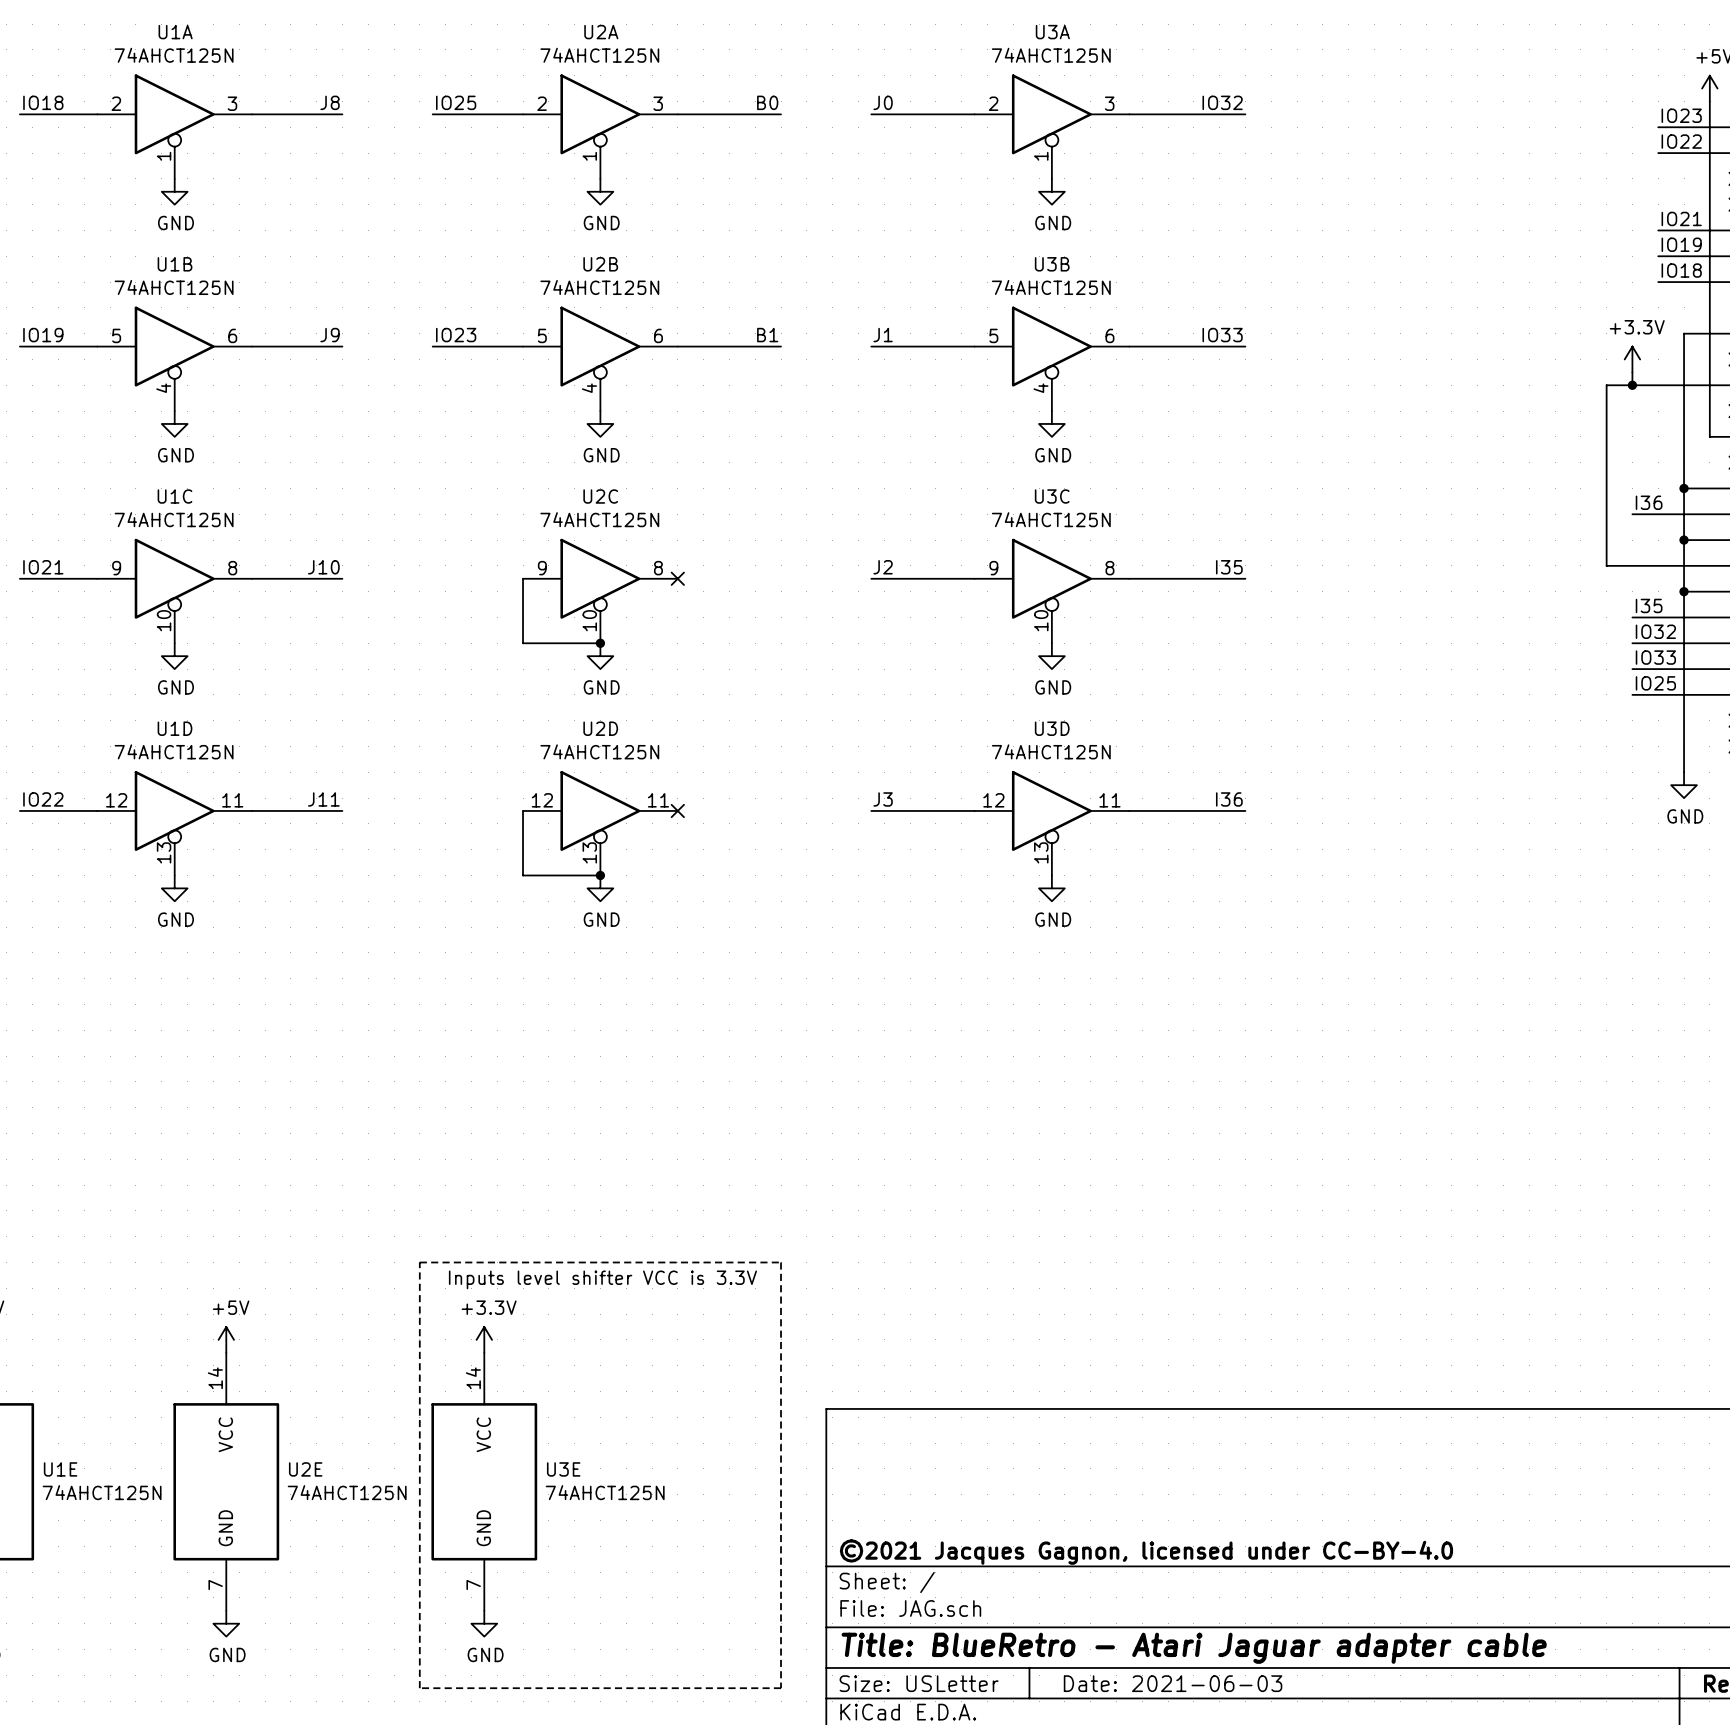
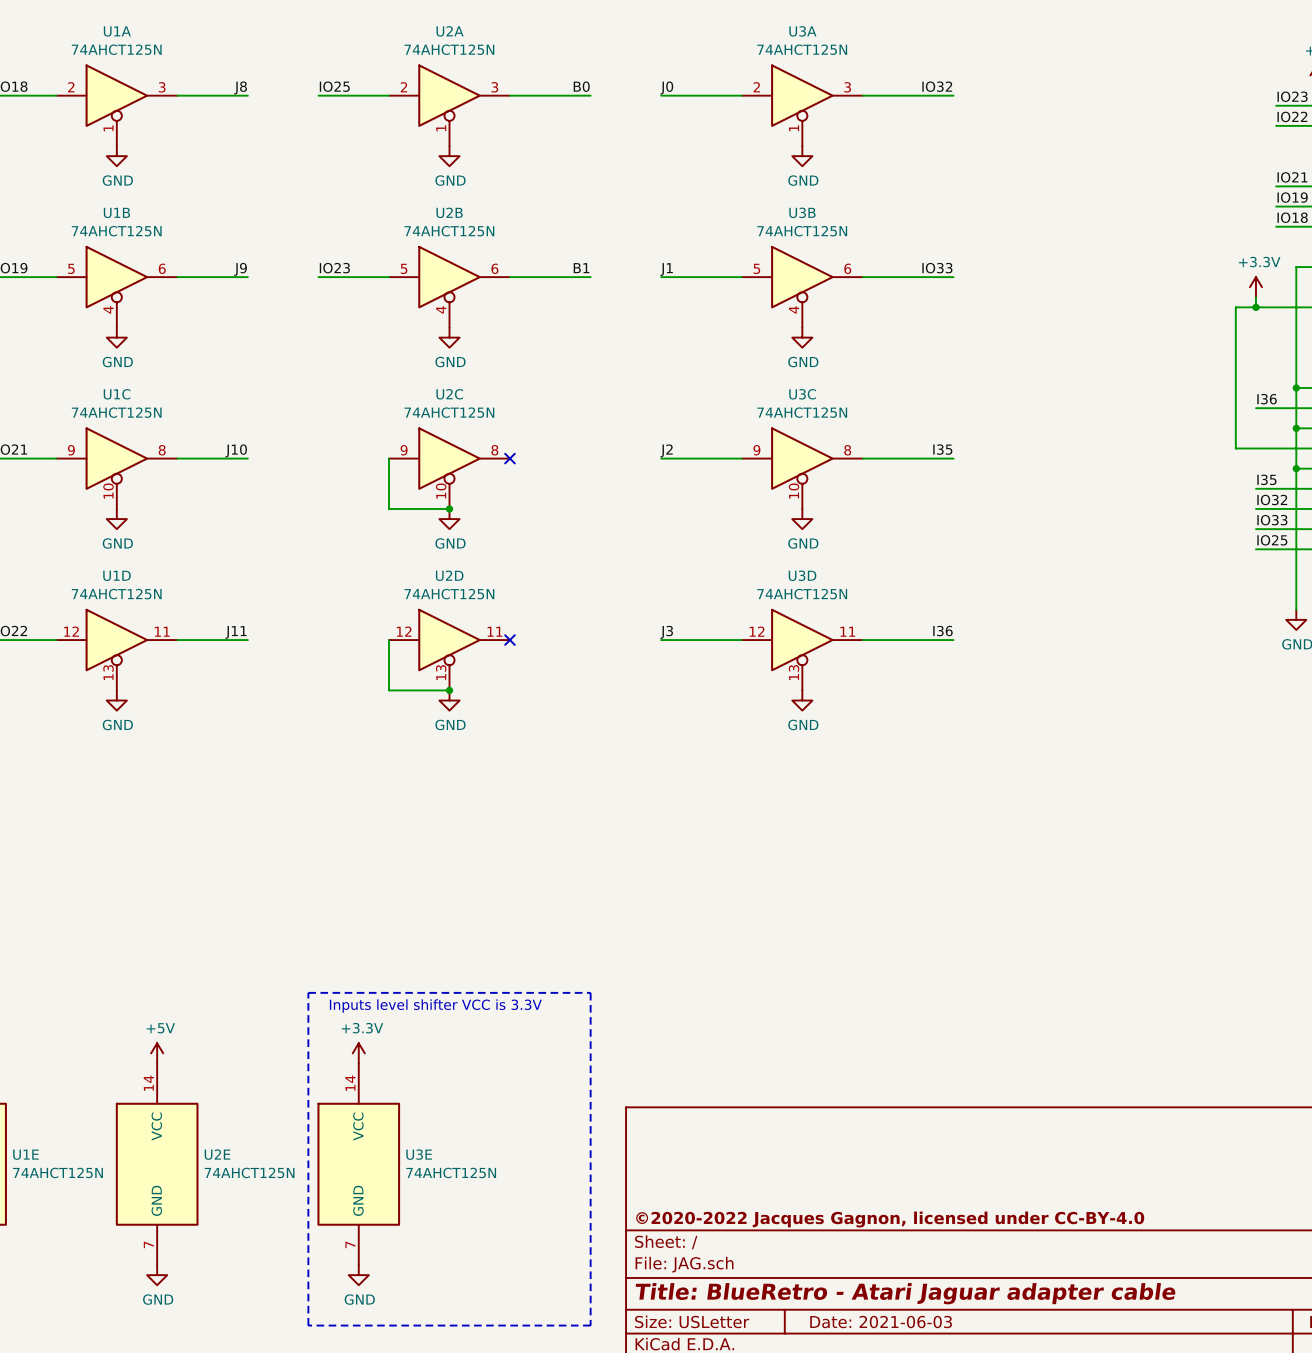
title block: ©2021 Jacques Gagnon, licensed under CC-BY-4.0 (1146, 1552) -> ©2020-2022 Jacques Gagnon, licensed under CC-BY-4.0 (890, 1219)

